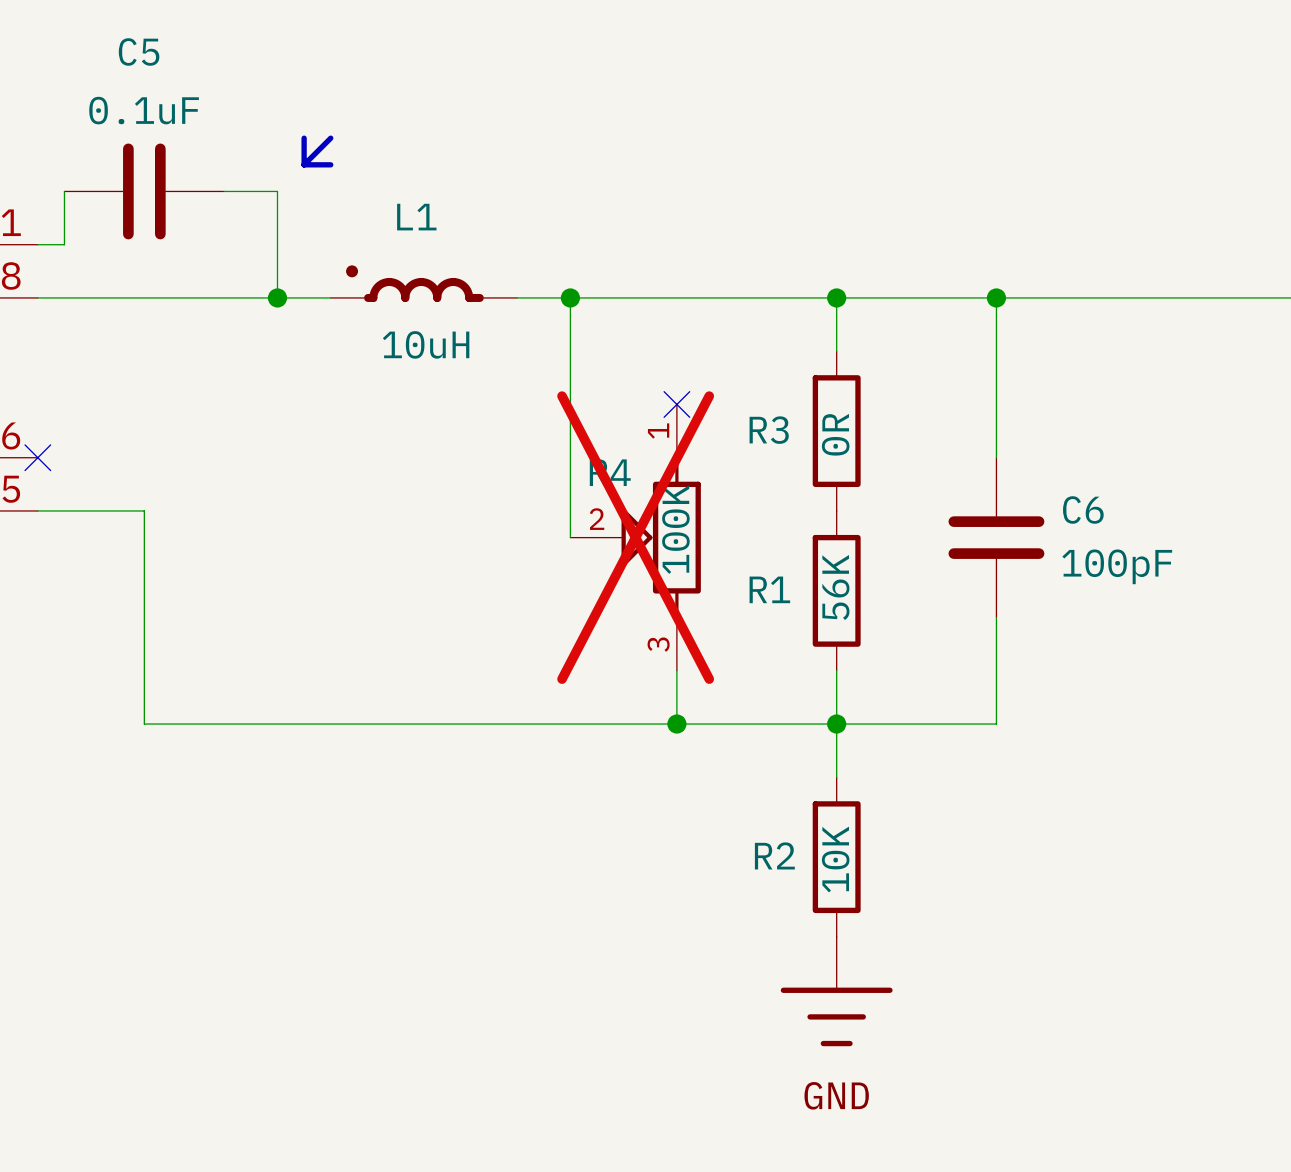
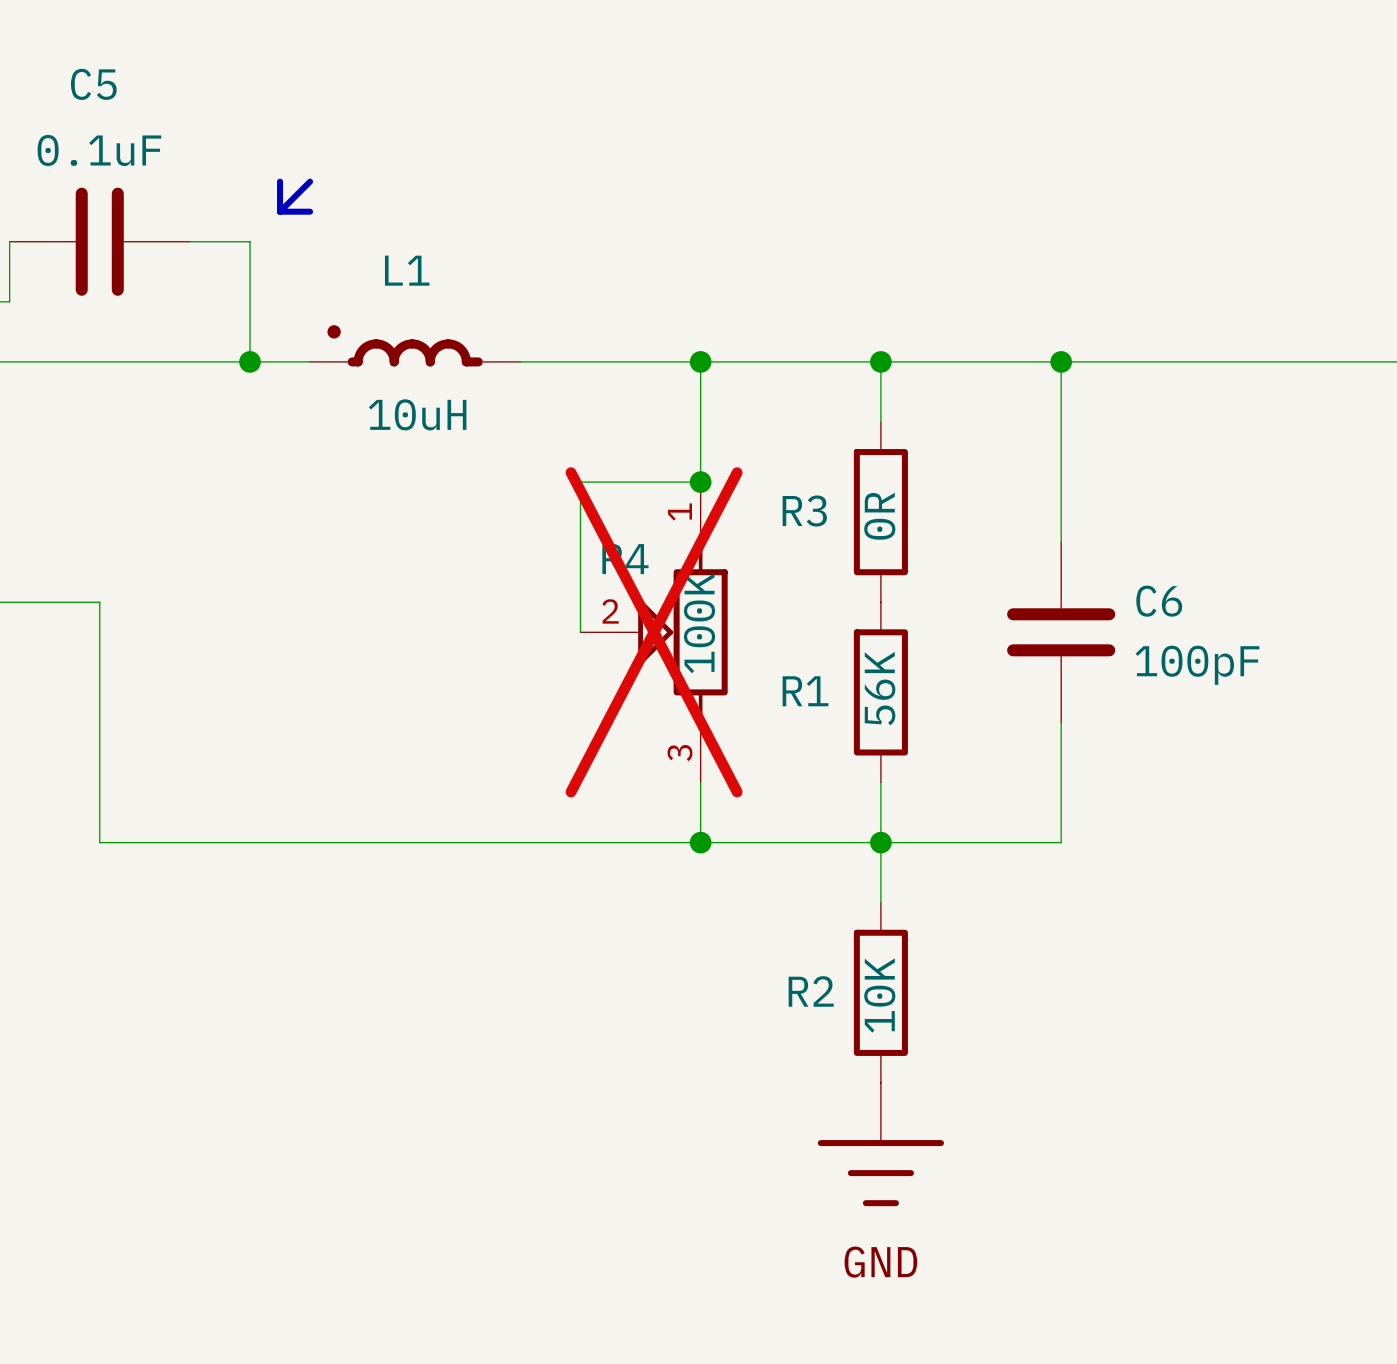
wire: (570, 297) (570, 404) -> (700, 361) (700, 482) (580, 482)
junction: (570, 297) -> none
junction: none -> (700, 361)
junction: none -> (700, 482)
no-connect mark: (676, 404) -> none

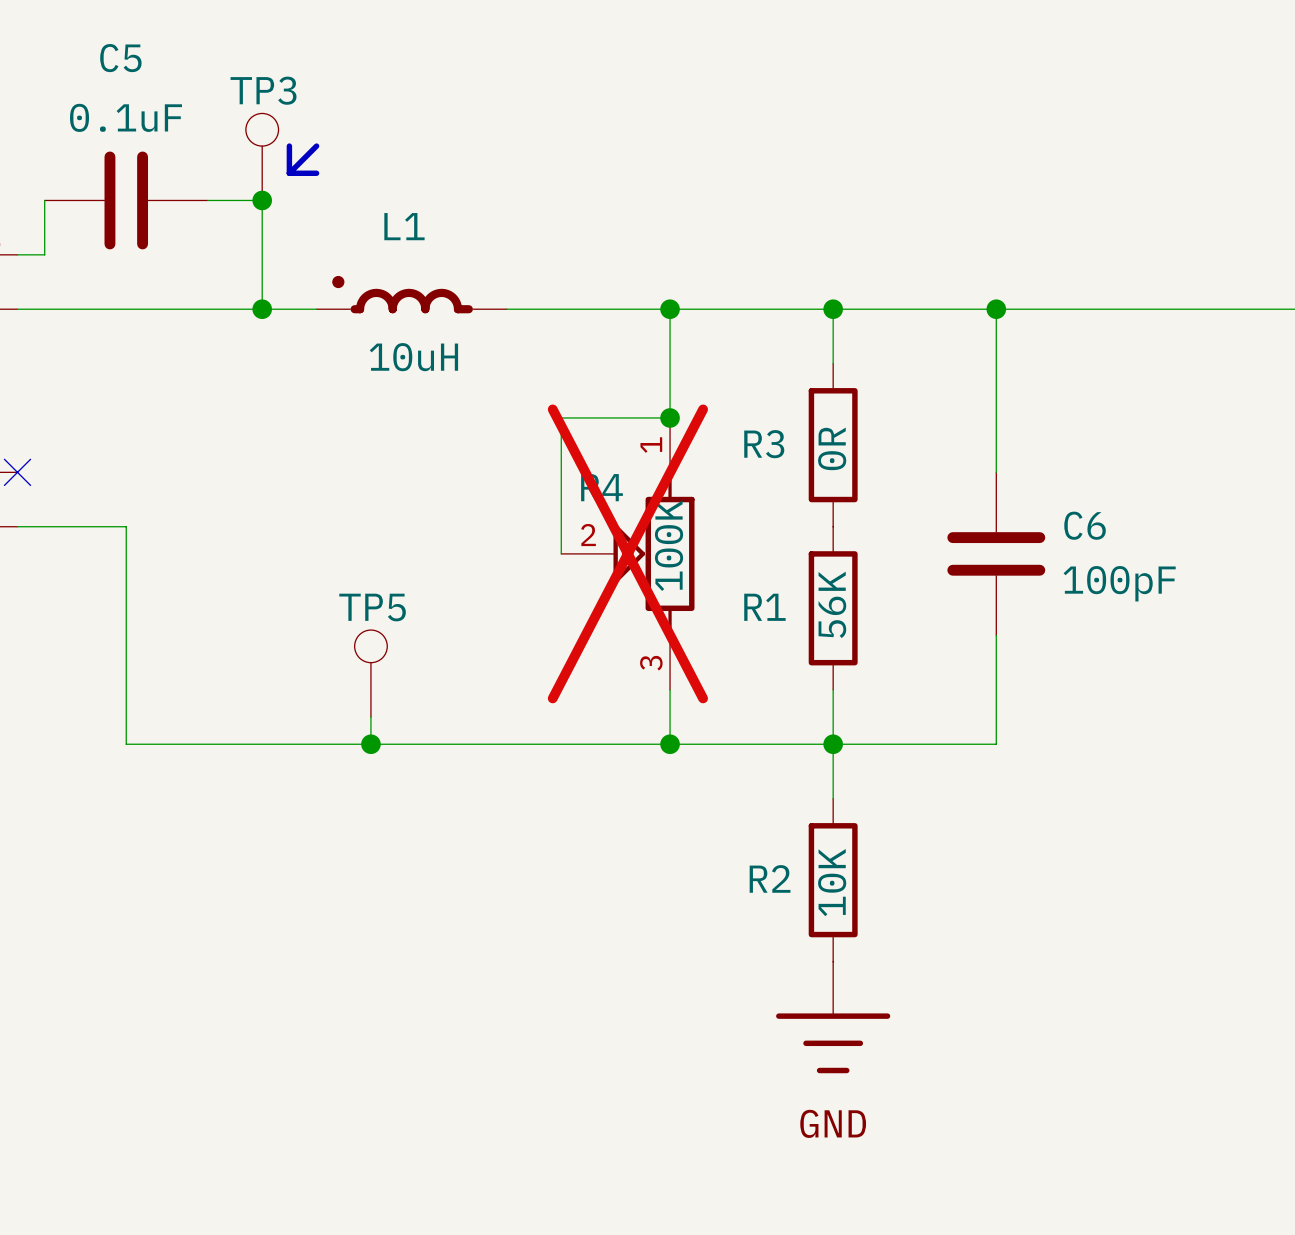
TP3: none -> (262, 156)
junction: none -> (262, 200)
TP5: none -> (370, 673)
wire: none -> (370, 717) (370, 744)
junction: none -> (370, 744)

